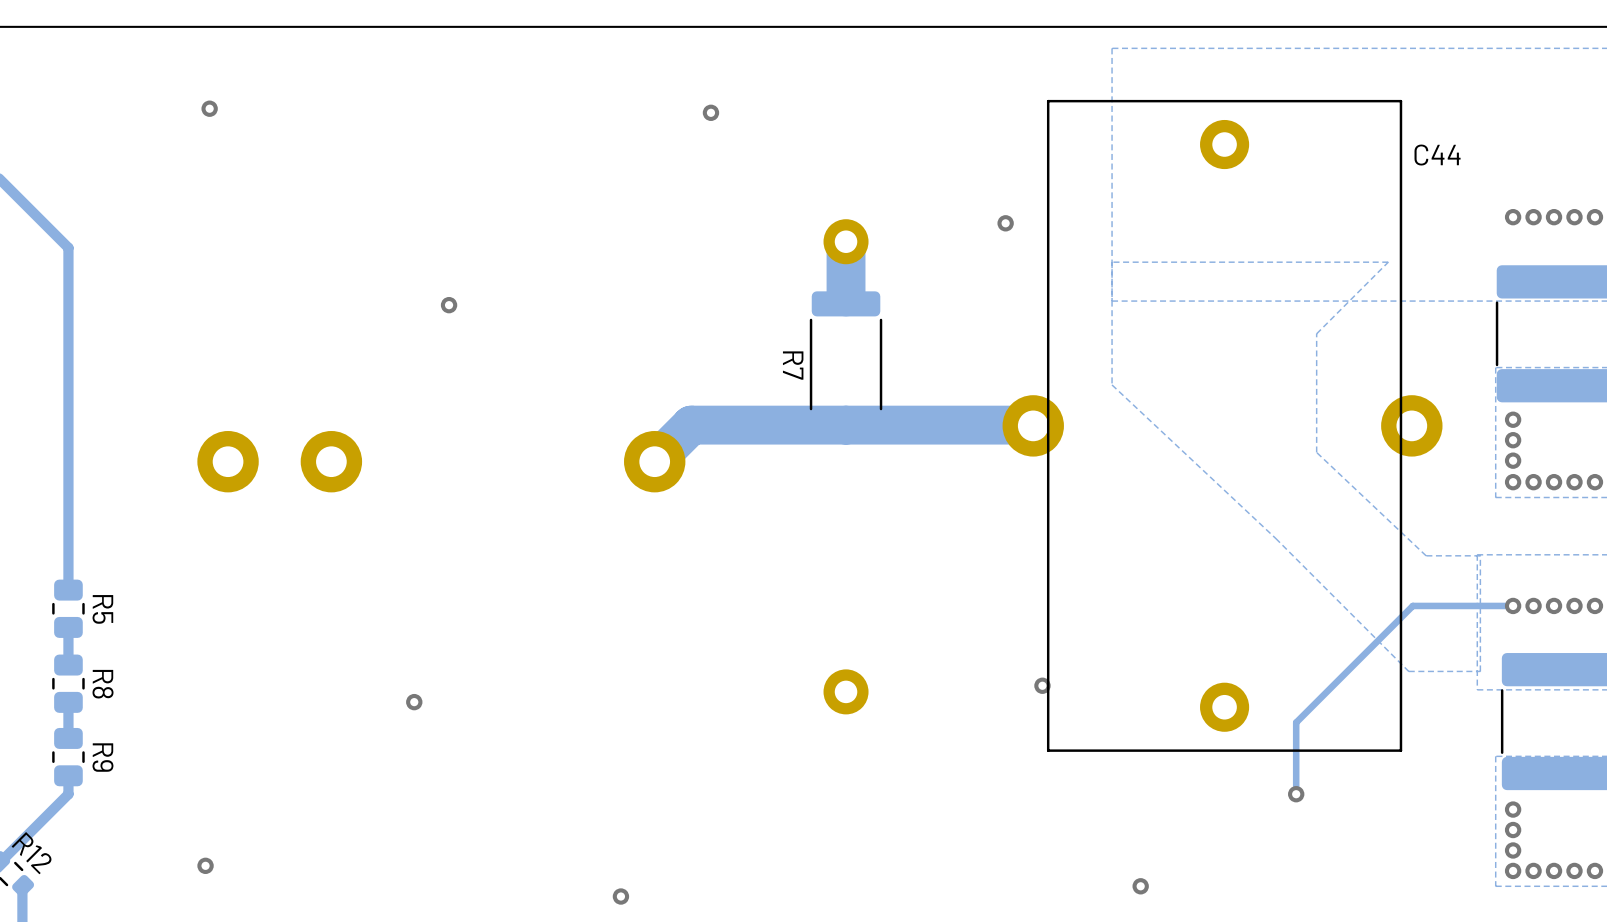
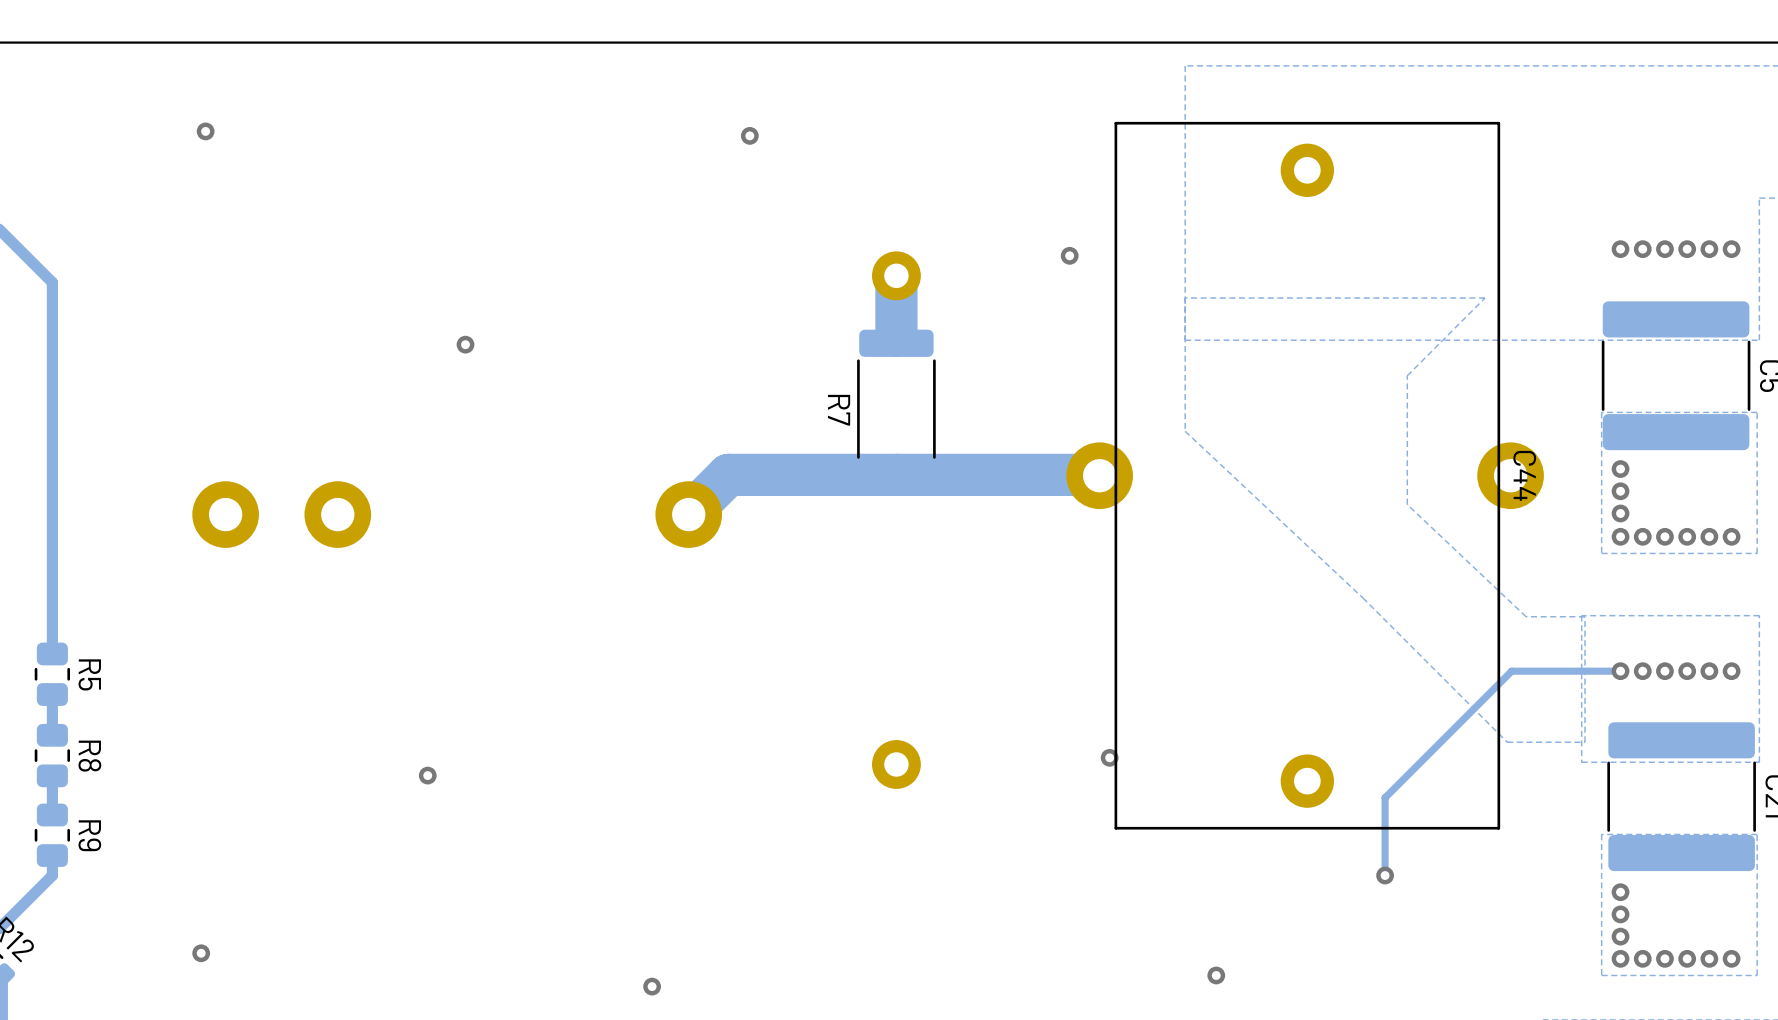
C44 name rotation: 0° (1437, 155) -> 90° clockwise (1524, 475)
C44 name position: C44 (1437, 155) -> C44 (1524, 475)

